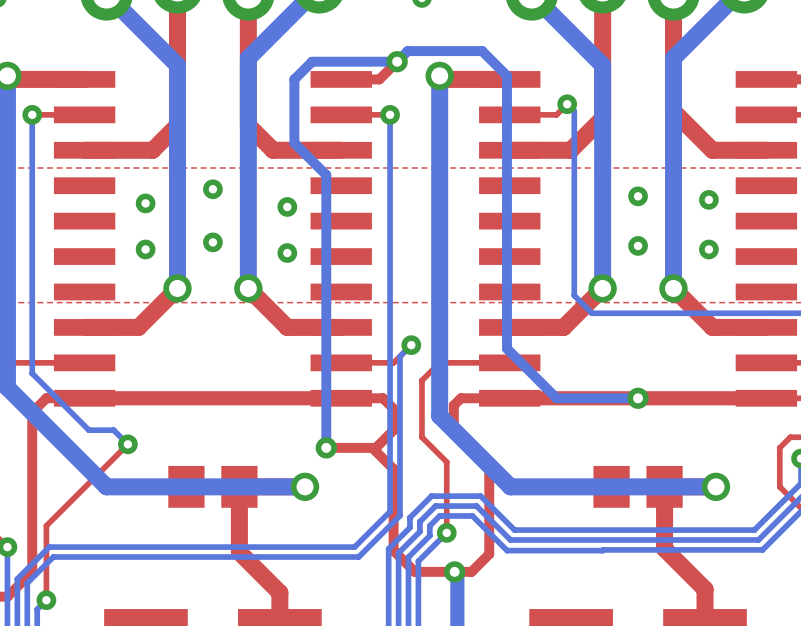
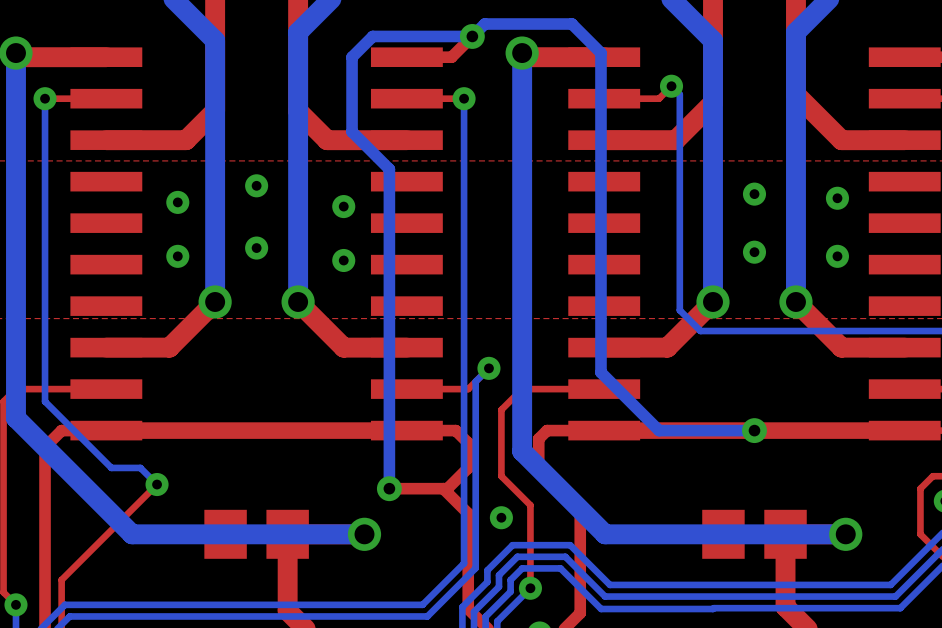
via: none -> (501, 517)

